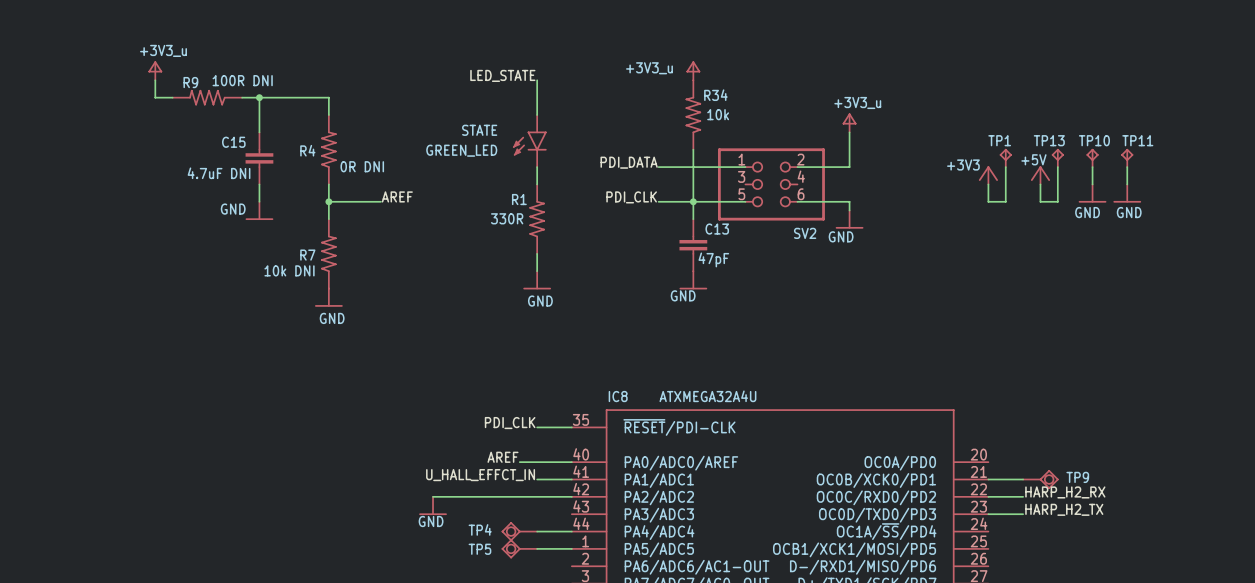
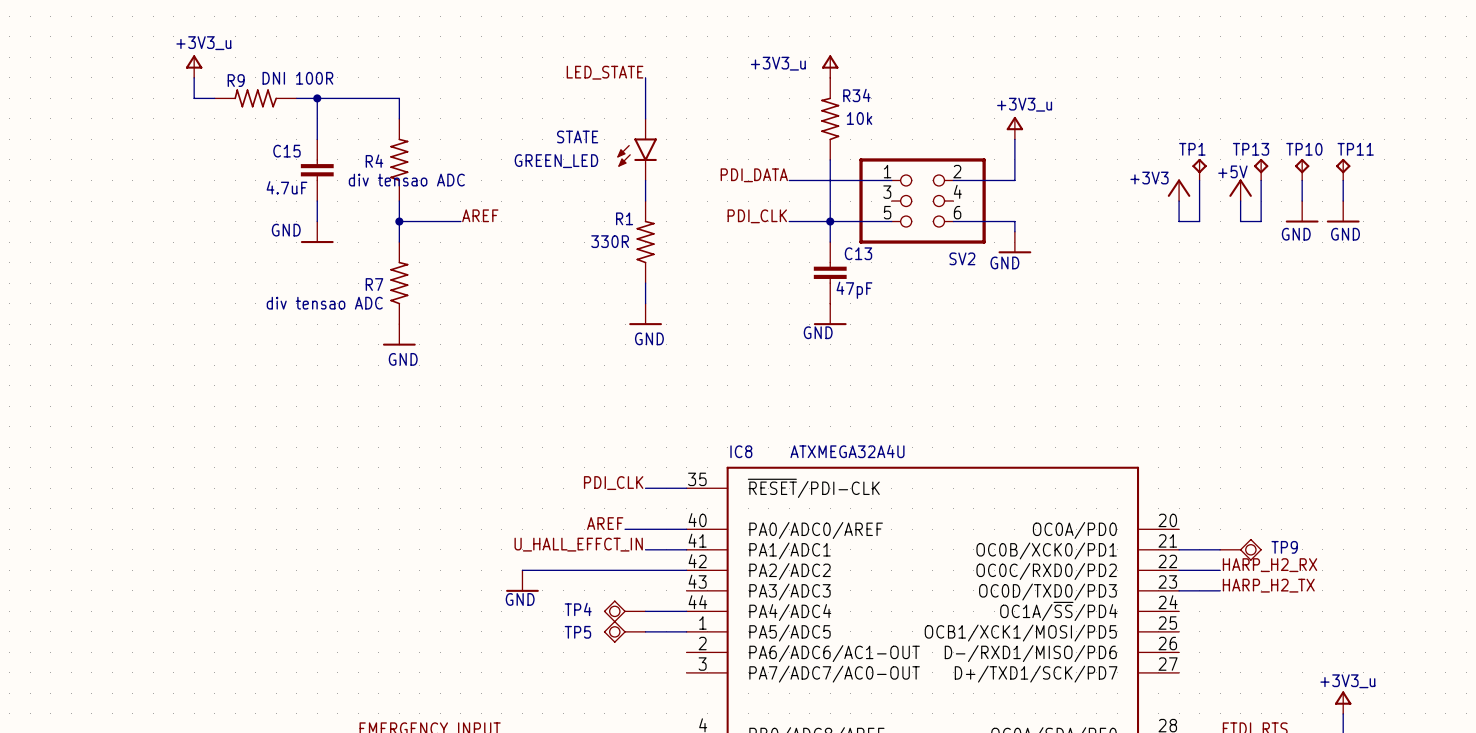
R9 value: 100R DNI (242, 80) -> DNI 100R (297, 78)
R4 value: 0R DNI (362, 166) -> div tensao ADC (406, 180)
C15 value: 4.7uF DNI (219, 173) -> 4.7uF (286, 187)
R7 value: 10k DNI (289, 270) -> div tensao ADC (324, 303)

